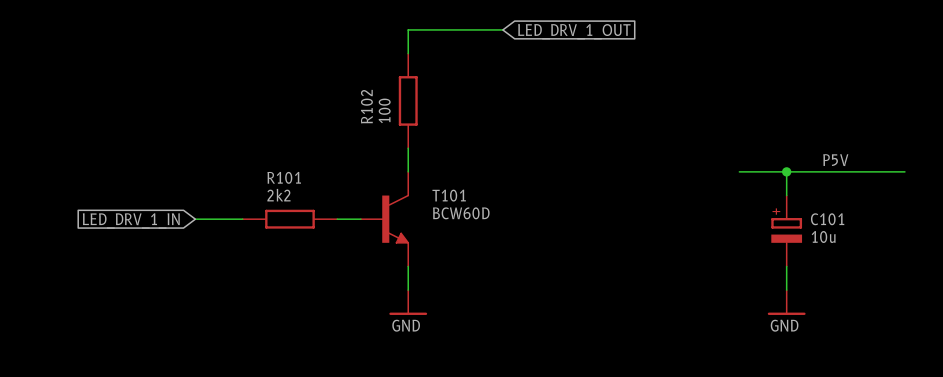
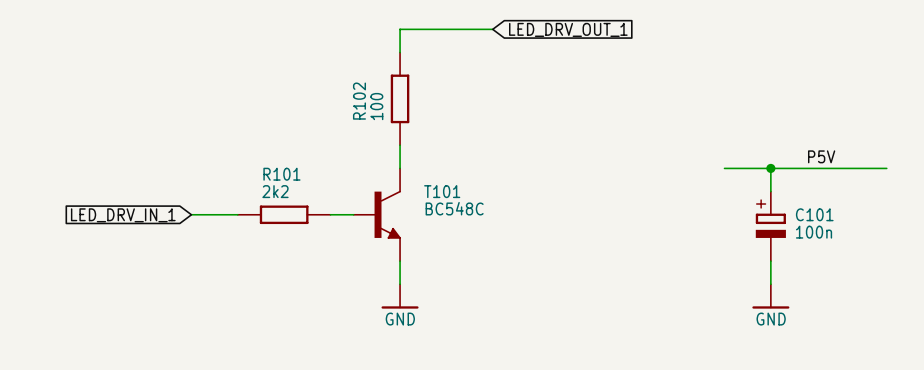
global label: LED_DRV_1_OUT (574, 31) -> LED_DRV_OUT_1 (568, 29)
T101 value: BCW60D (461, 213) -> BC548C (454, 208)
global label: LED_DRV_1_IN (131, 220) -> LED_DRV_IN_1 (123, 215)
C101 value: 10u (823, 236) -> 100n (814, 232)

